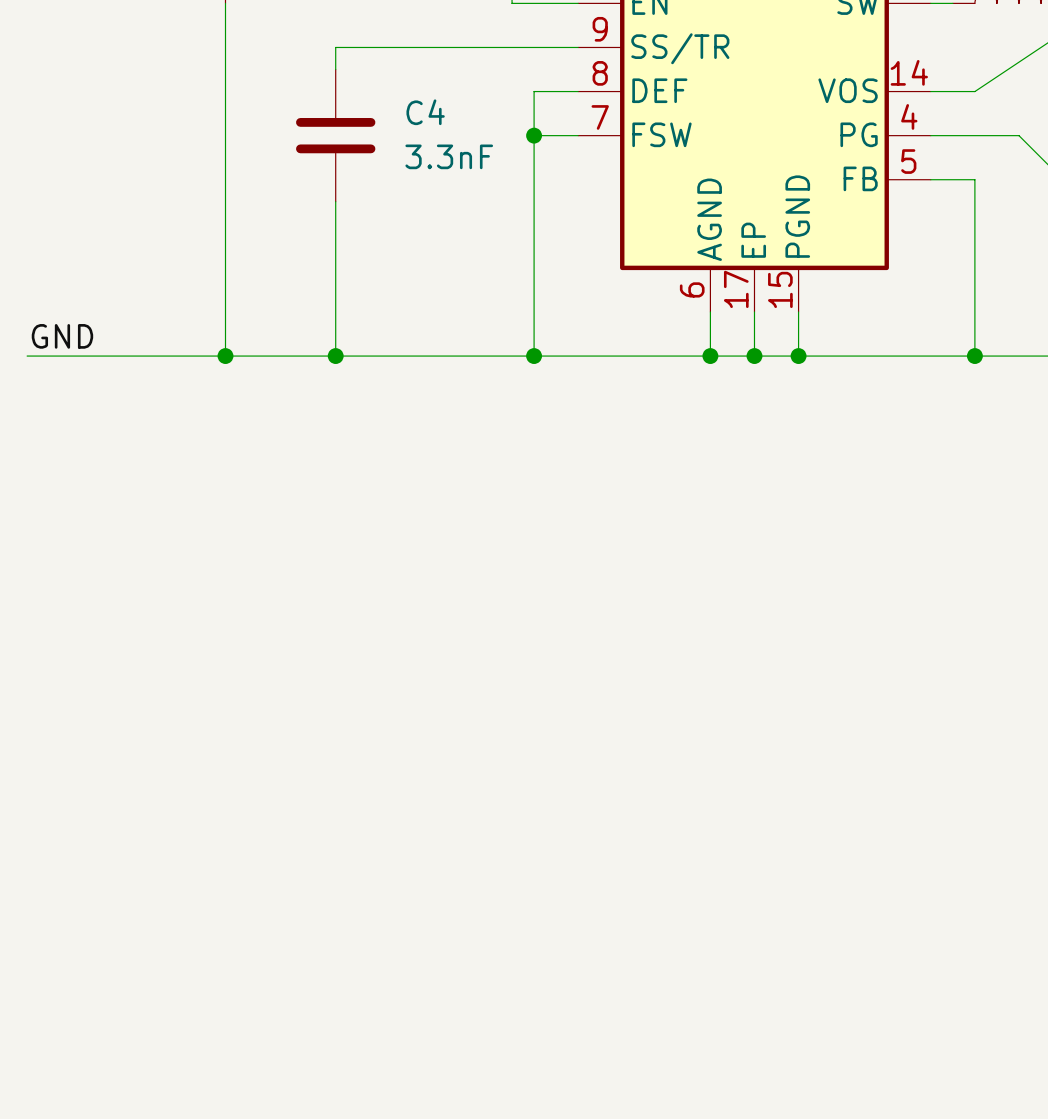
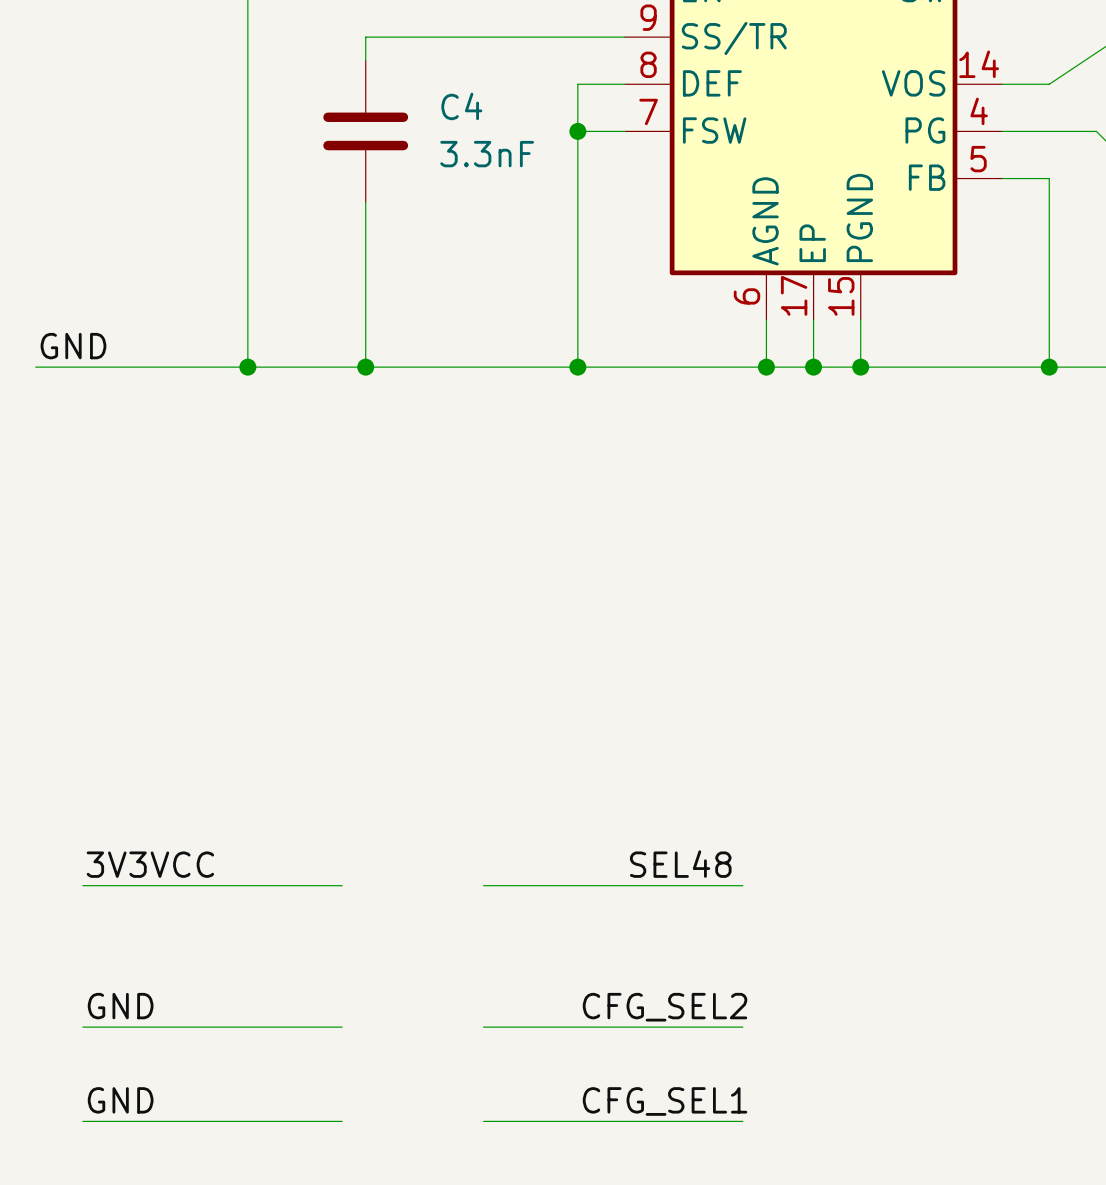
label: none -> SEL48 (680, 864)
label: none -> 3V3VCC (150, 864)
wire: none -> (82, 885) (342, 885)
wire: none -> (483, 885) (742, 885)
label: none -> GND (120, 1006)
label: none -> CFG_SEL2 (665, 1007)
wire: none -> (82, 1027) (342, 1027)
wire: none -> (483, 1027) (742, 1027)
label: none -> GND (120, 1100)
label: none -> CFG_SEL1 (665, 1101)
wire: none -> (82, 1121) (342, 1121)
wire: none -> (483, 1121) (742, 1121)

